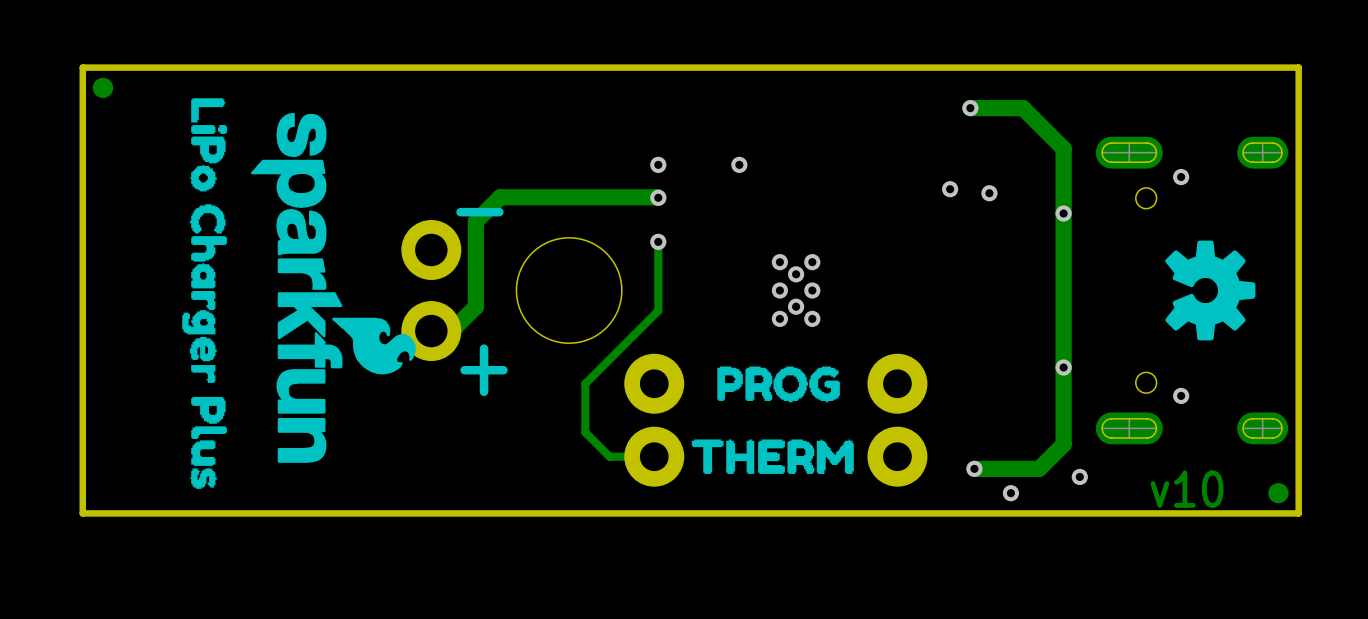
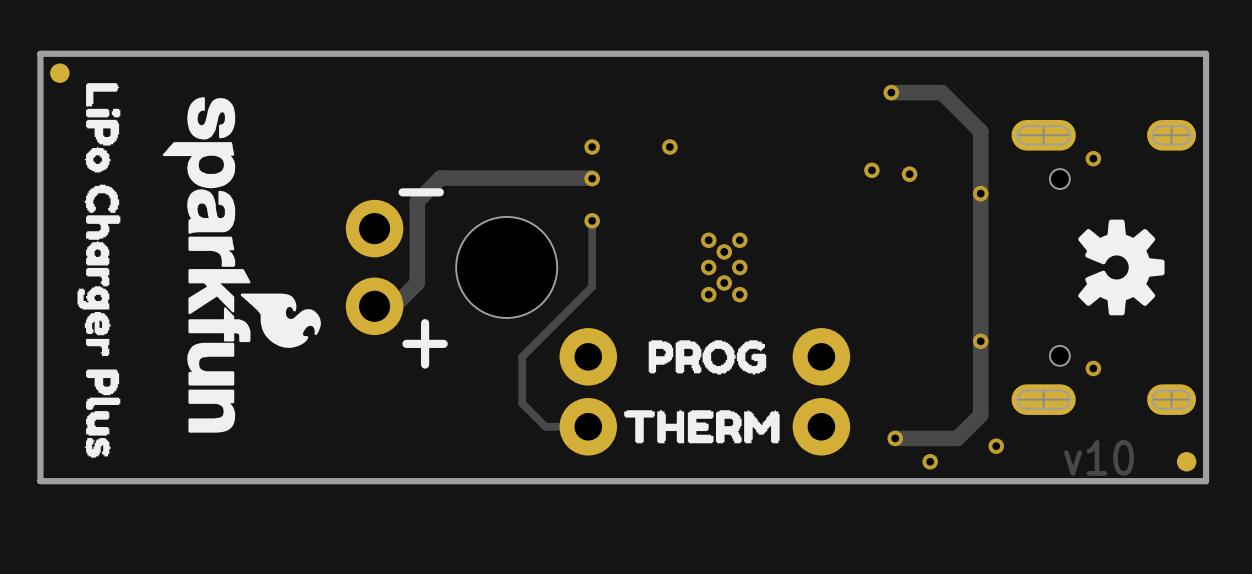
drawing position: (333, 287) -> (241, 264)
drawing position: (204, 293) -> (98, 270)

